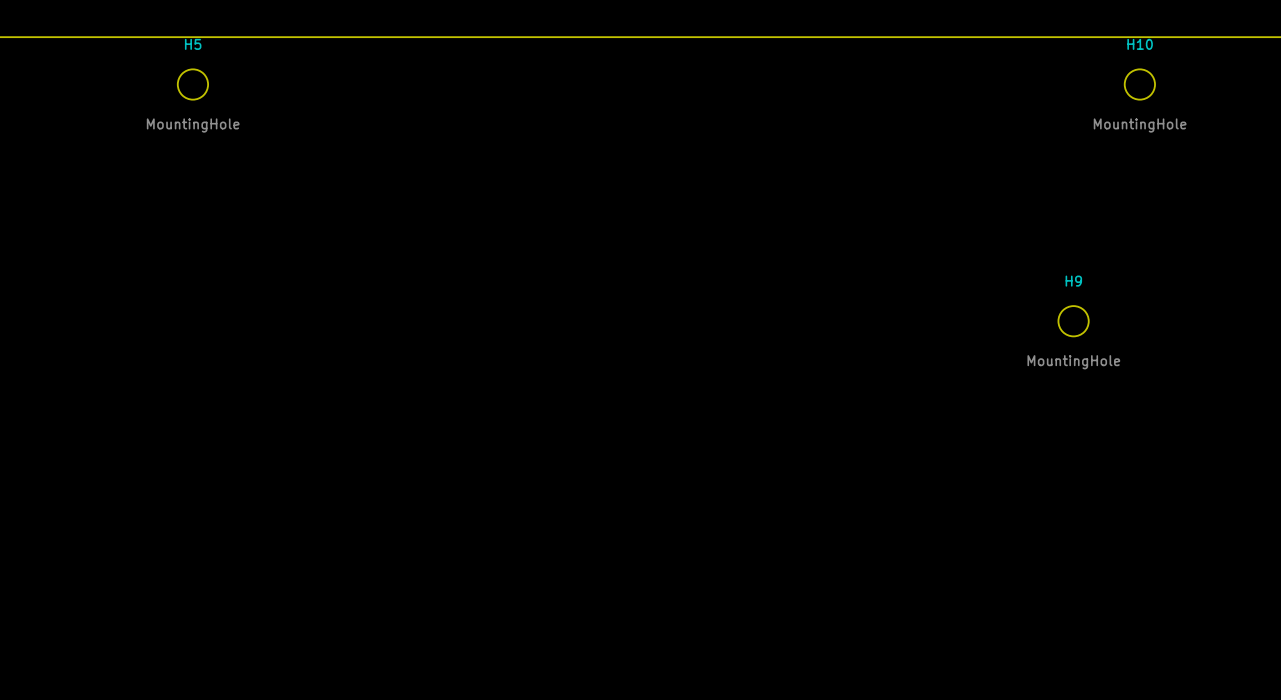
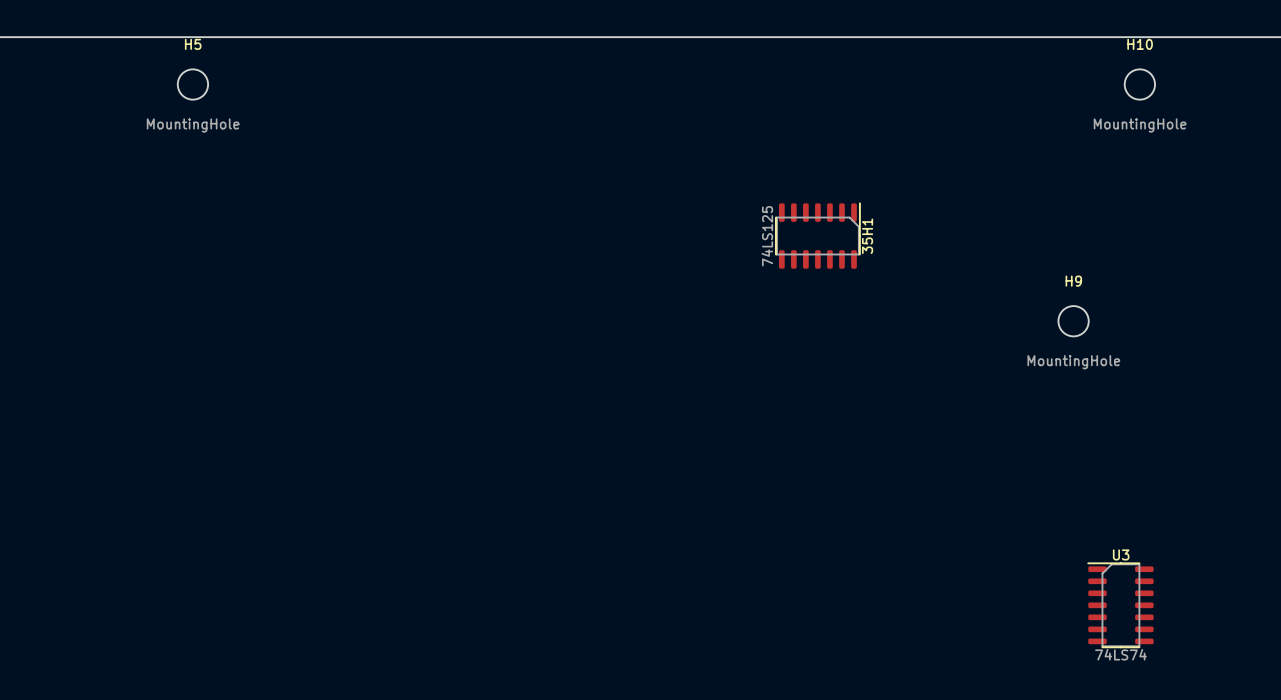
35H1: none -> 74LS125 (817, 235)
U3: none -> 74LS74 (1120, 605)

